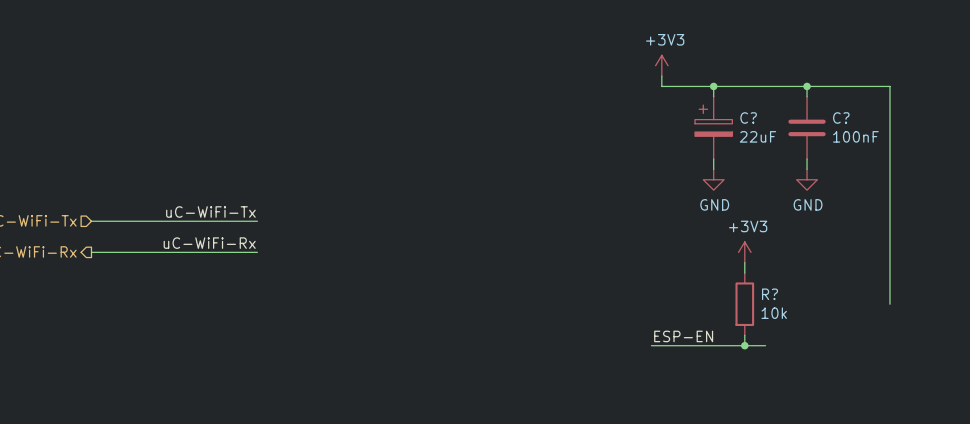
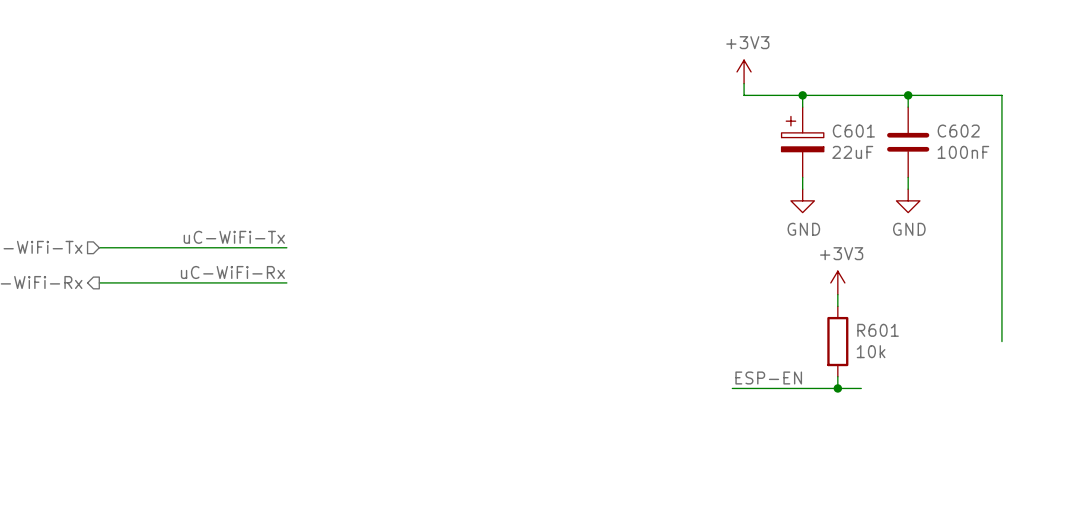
C? name: C? (748, 117) -> C601 (853, 131)
C? name: C? (841, 117) -> C602 (958, 131)
R? name: R? (770, 294) -> R601 (878, 330)

